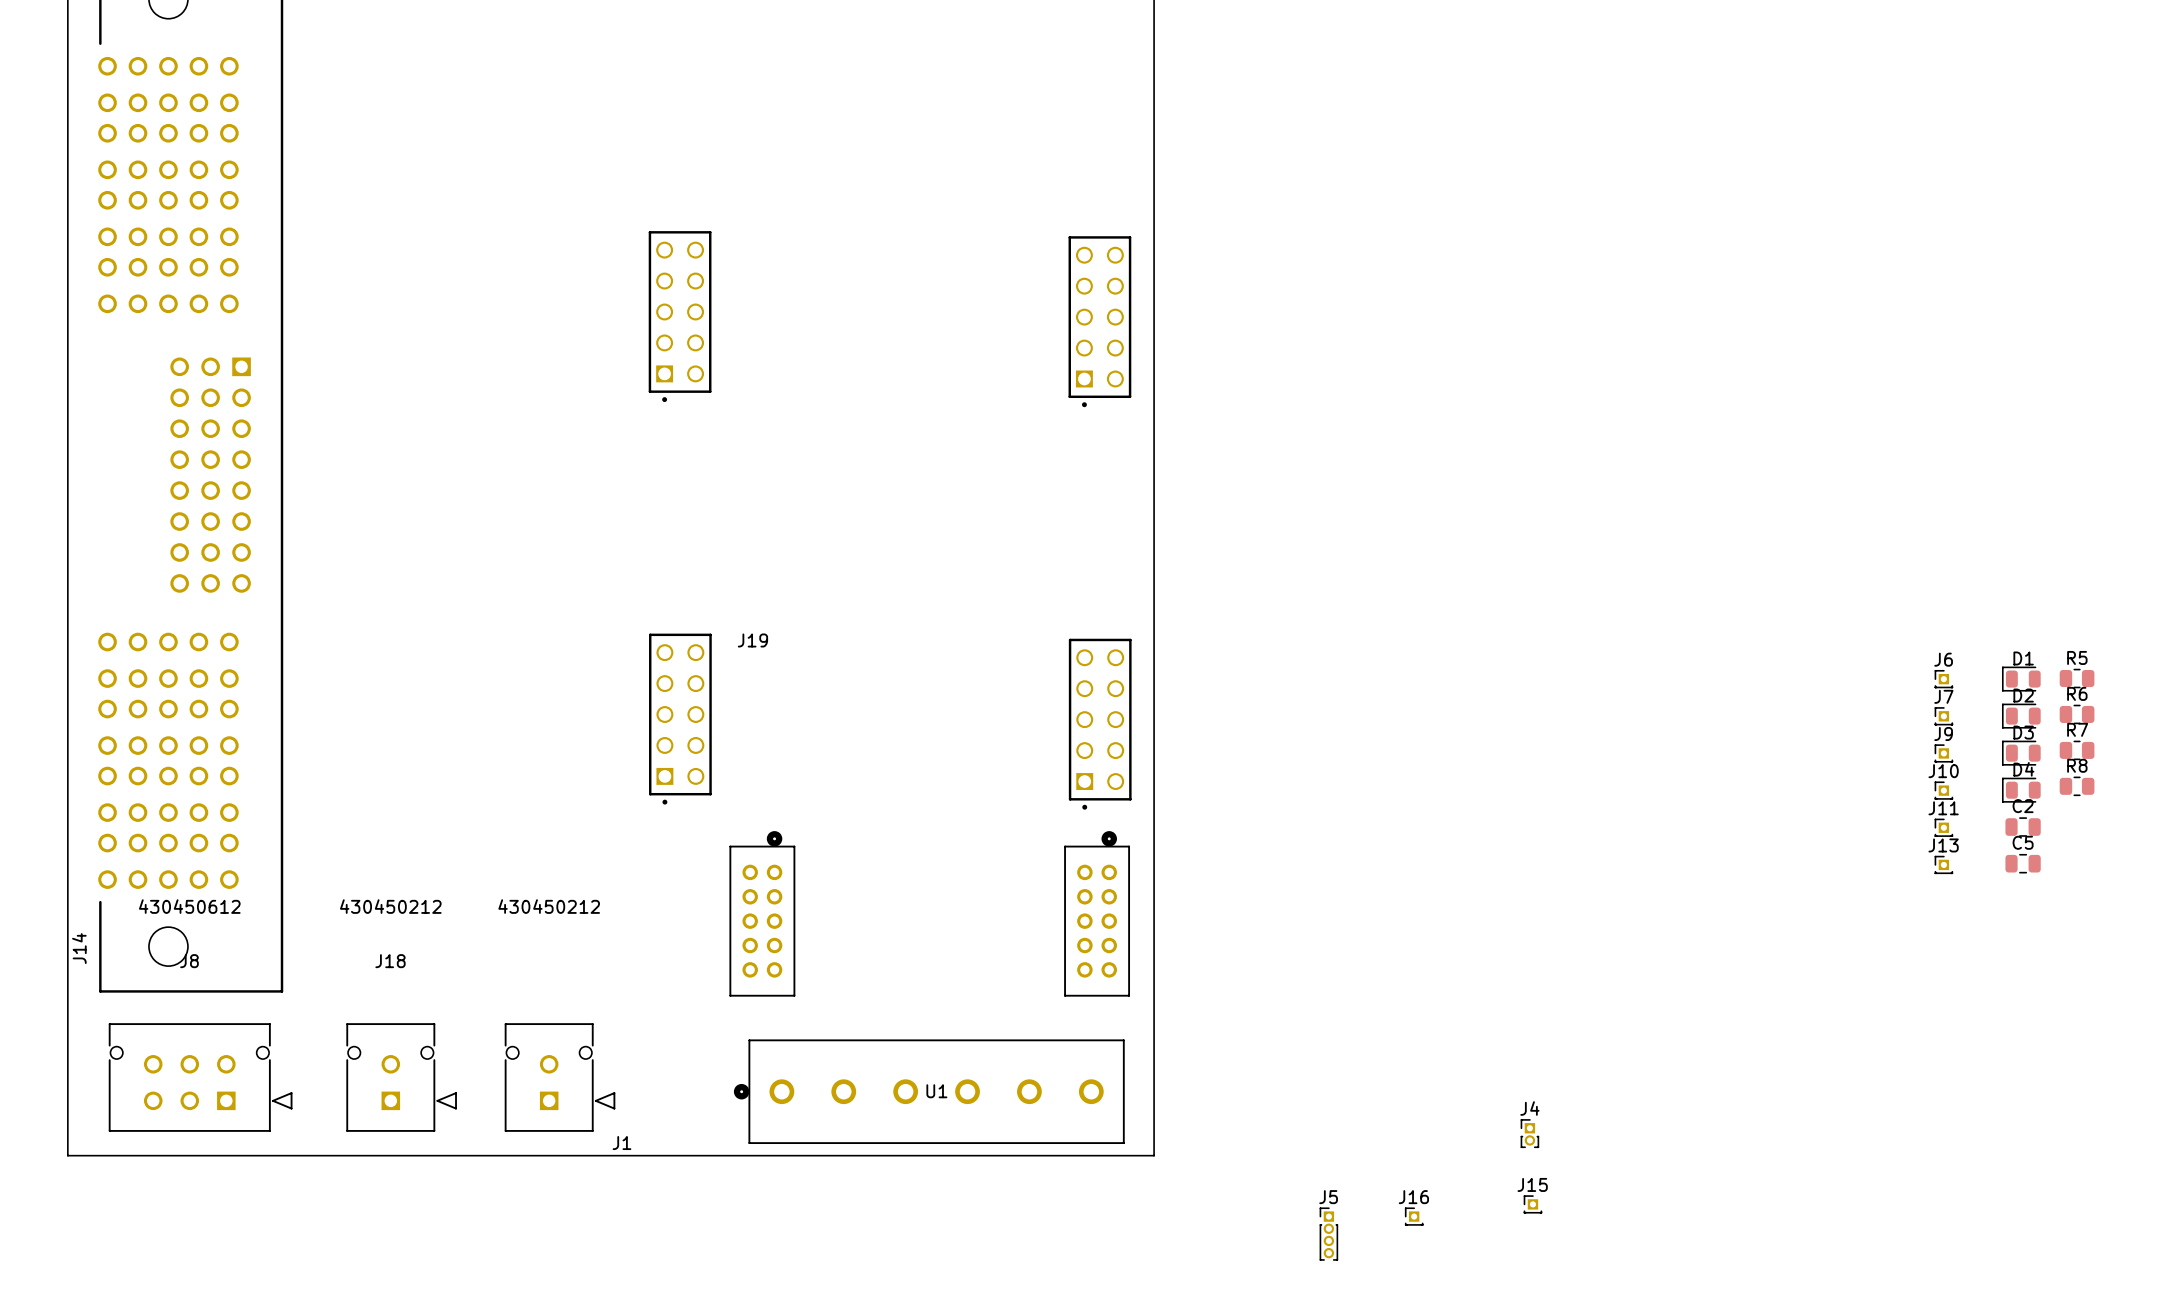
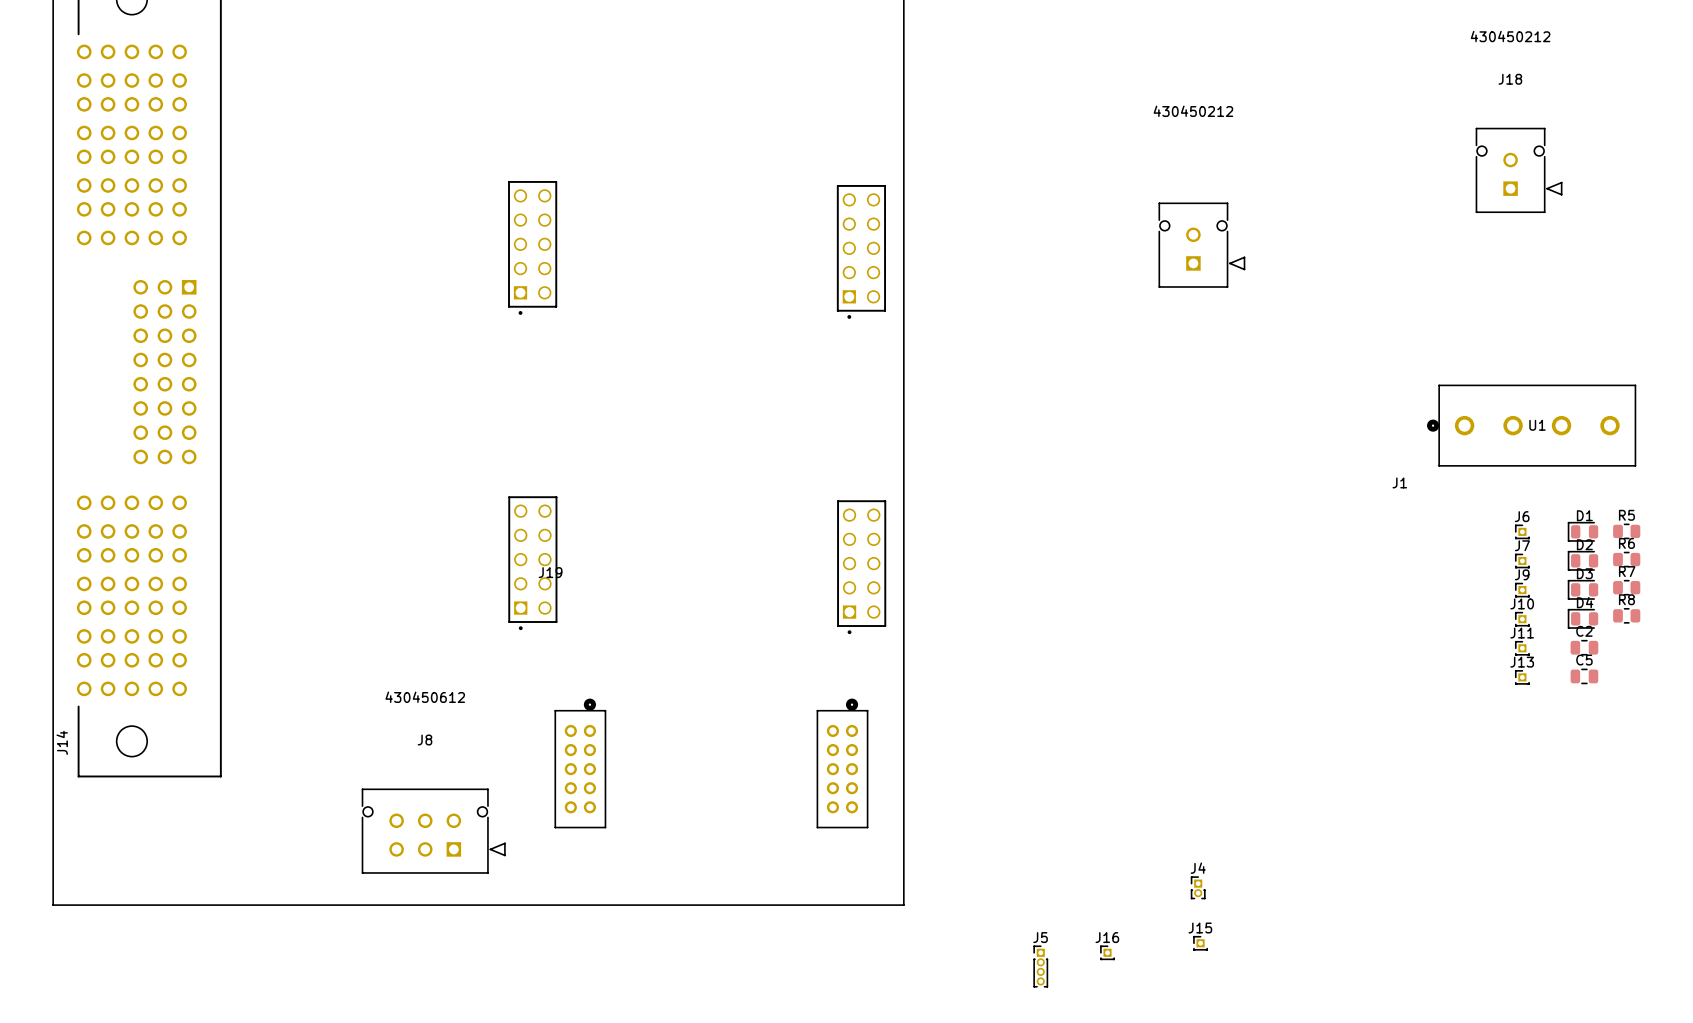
J19 name position: J19 (752, 640) -> J19 (550, 572)
J19 position: (929, 913) -> (711, 763)
U1 footprint: [733, 1039, 1125, 1145] -> [1427, 384, 1637, 467]
J8 position: (200, 1077) -> (433, 831)
J18 position: (401, 1077) -> (1519, 170)
J1 position: (560, 1077) -> (1201, 245)
J1 name position: J1 (621, 1143) -> J1 (1399, 482)

